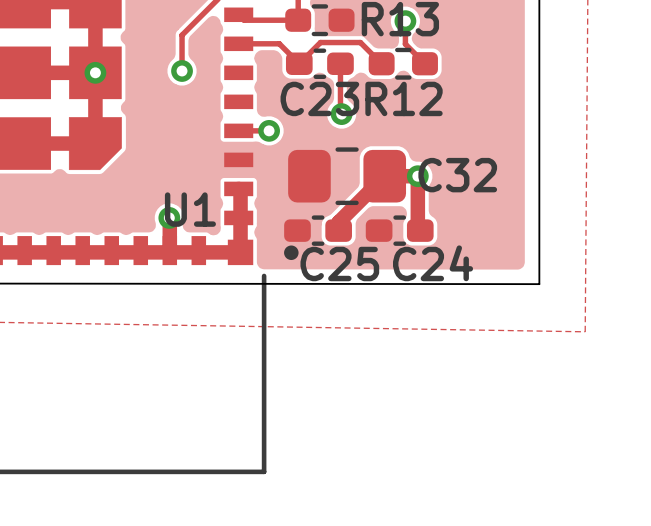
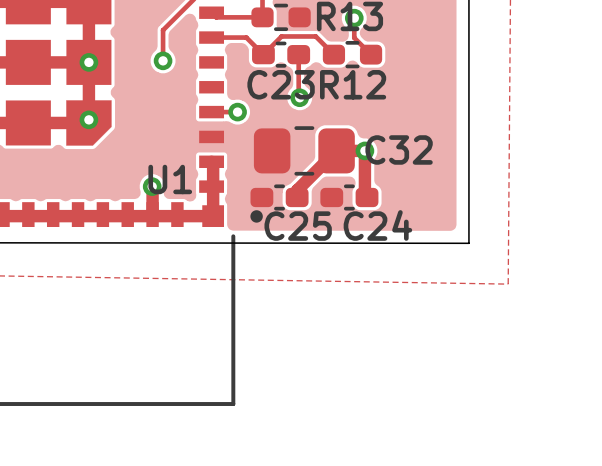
via: none -> (88, 119)

